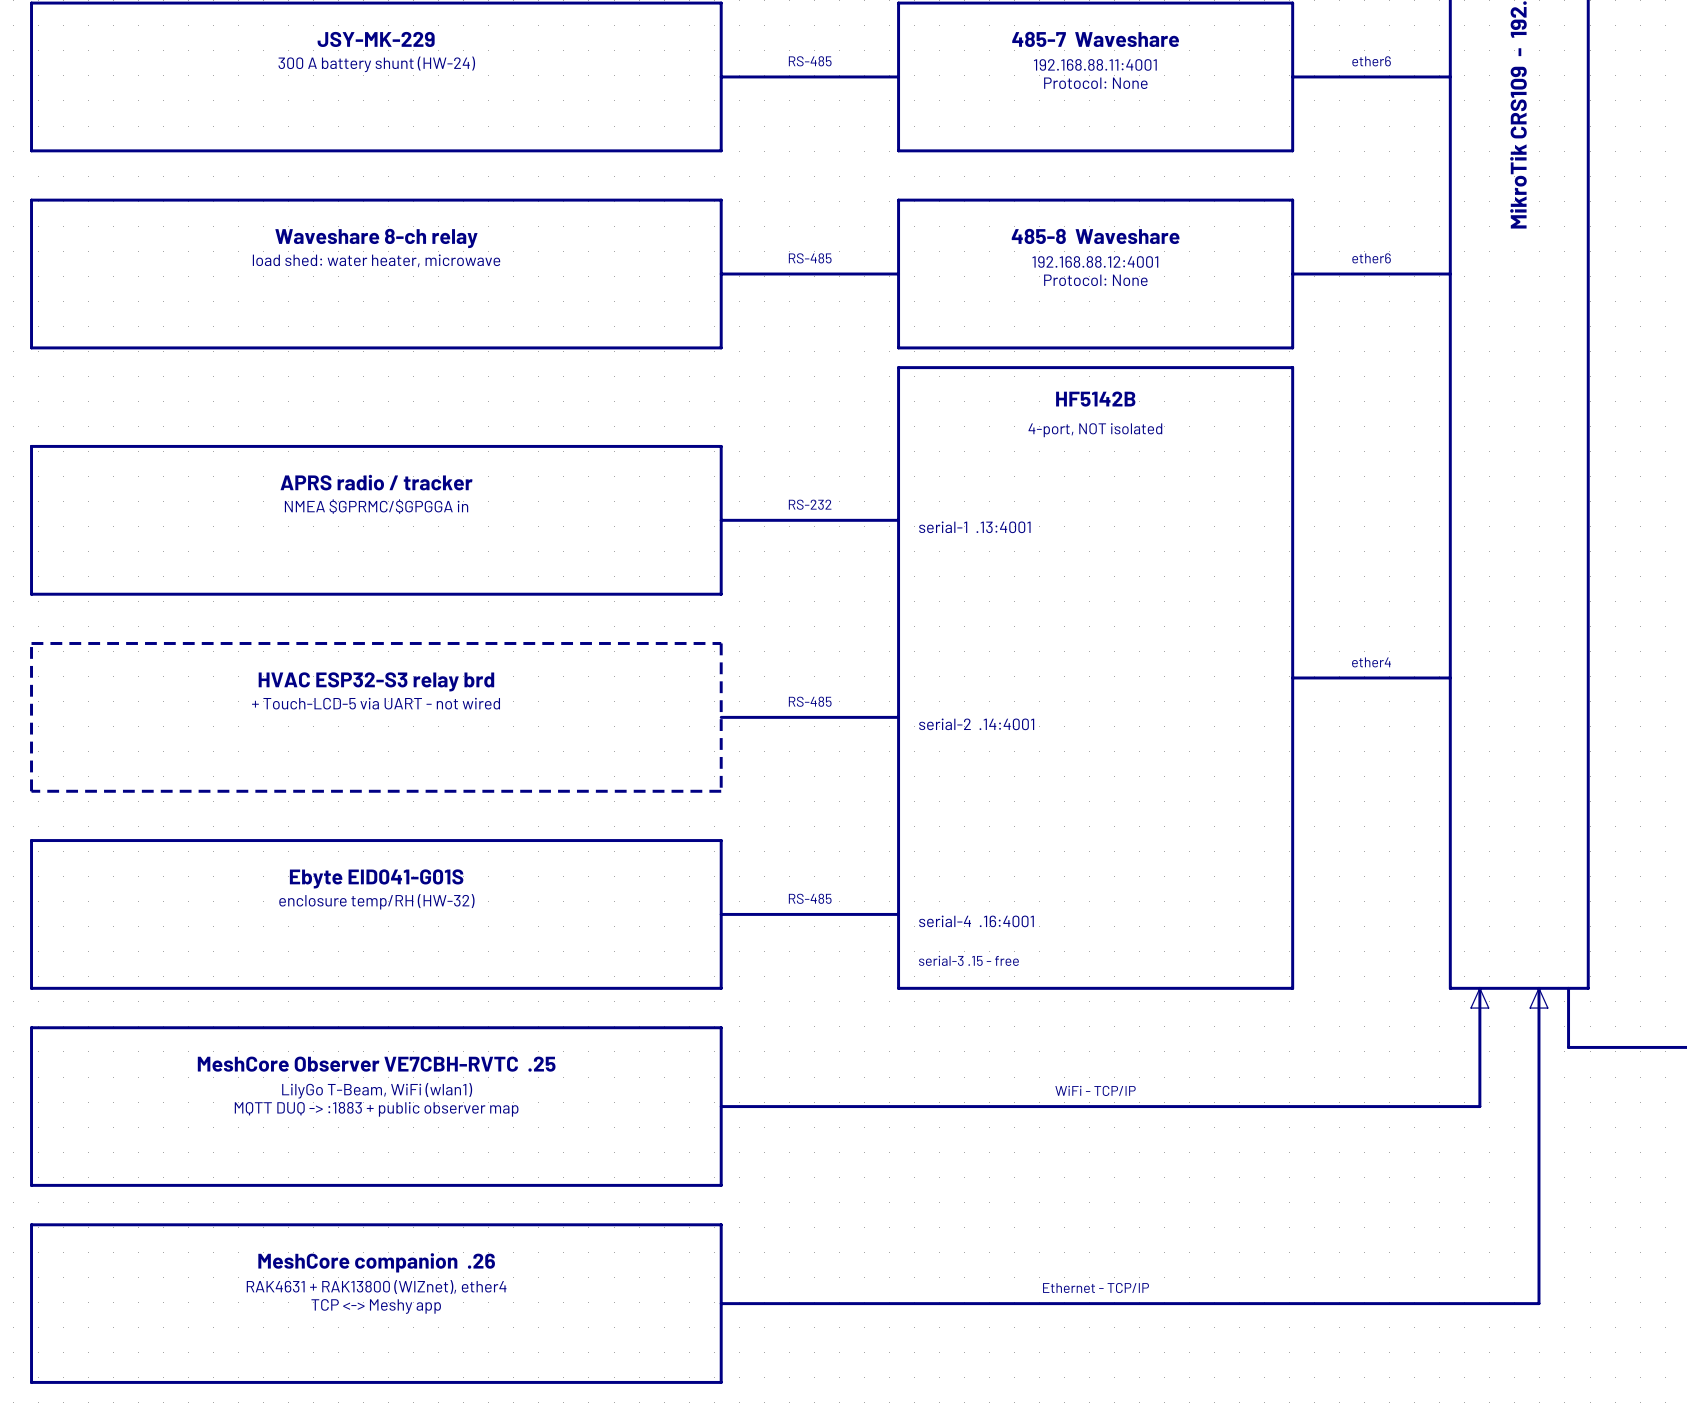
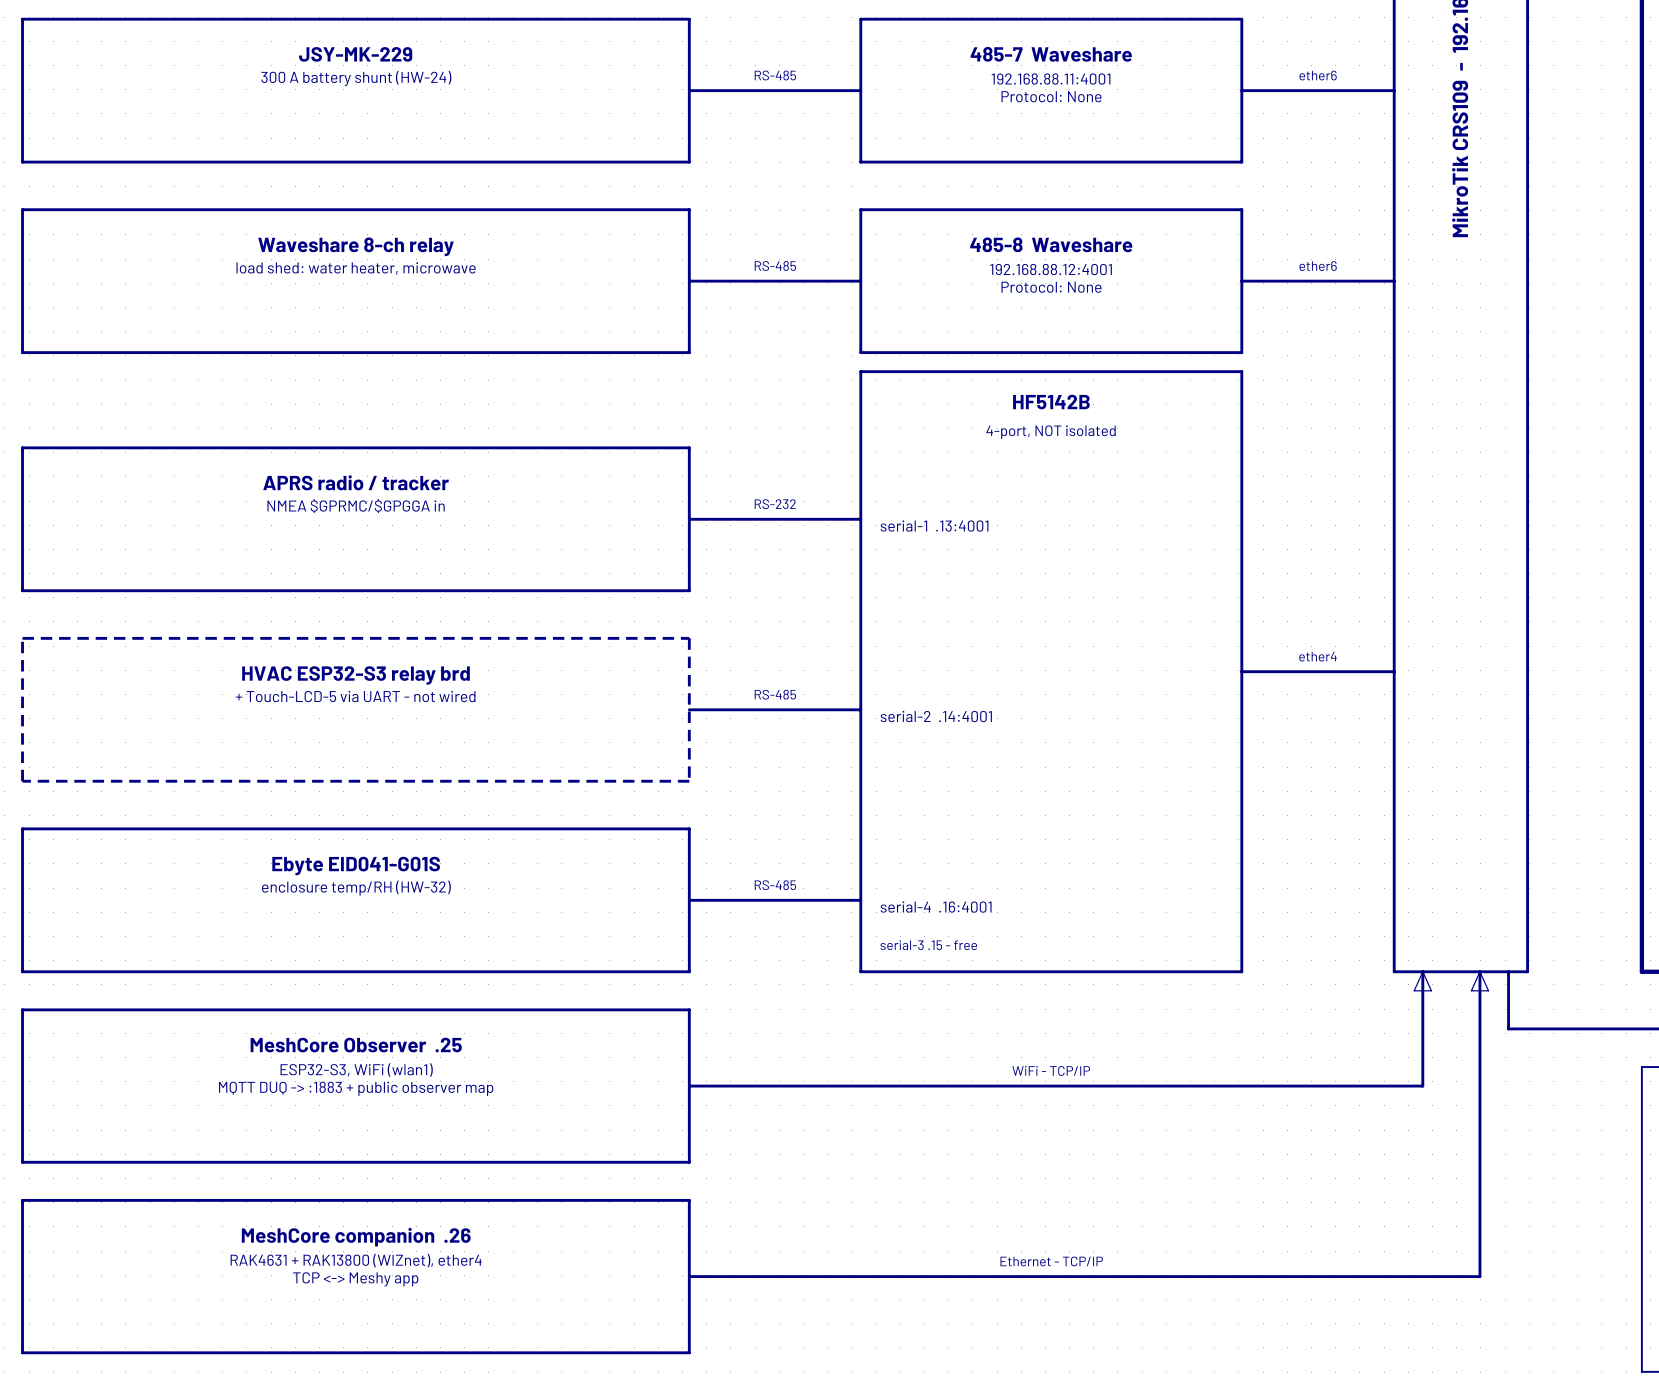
text: MeshCore Observer VE7CBH-RVTC .25 (376, 1064) -> MeshCore Observer .25 (356, 1045)
text: LilyGo T-Beam, WiFi (wlan1) (377, 1090) -> ESP32-S3, WiFi (wlan1) (356, 1070)

